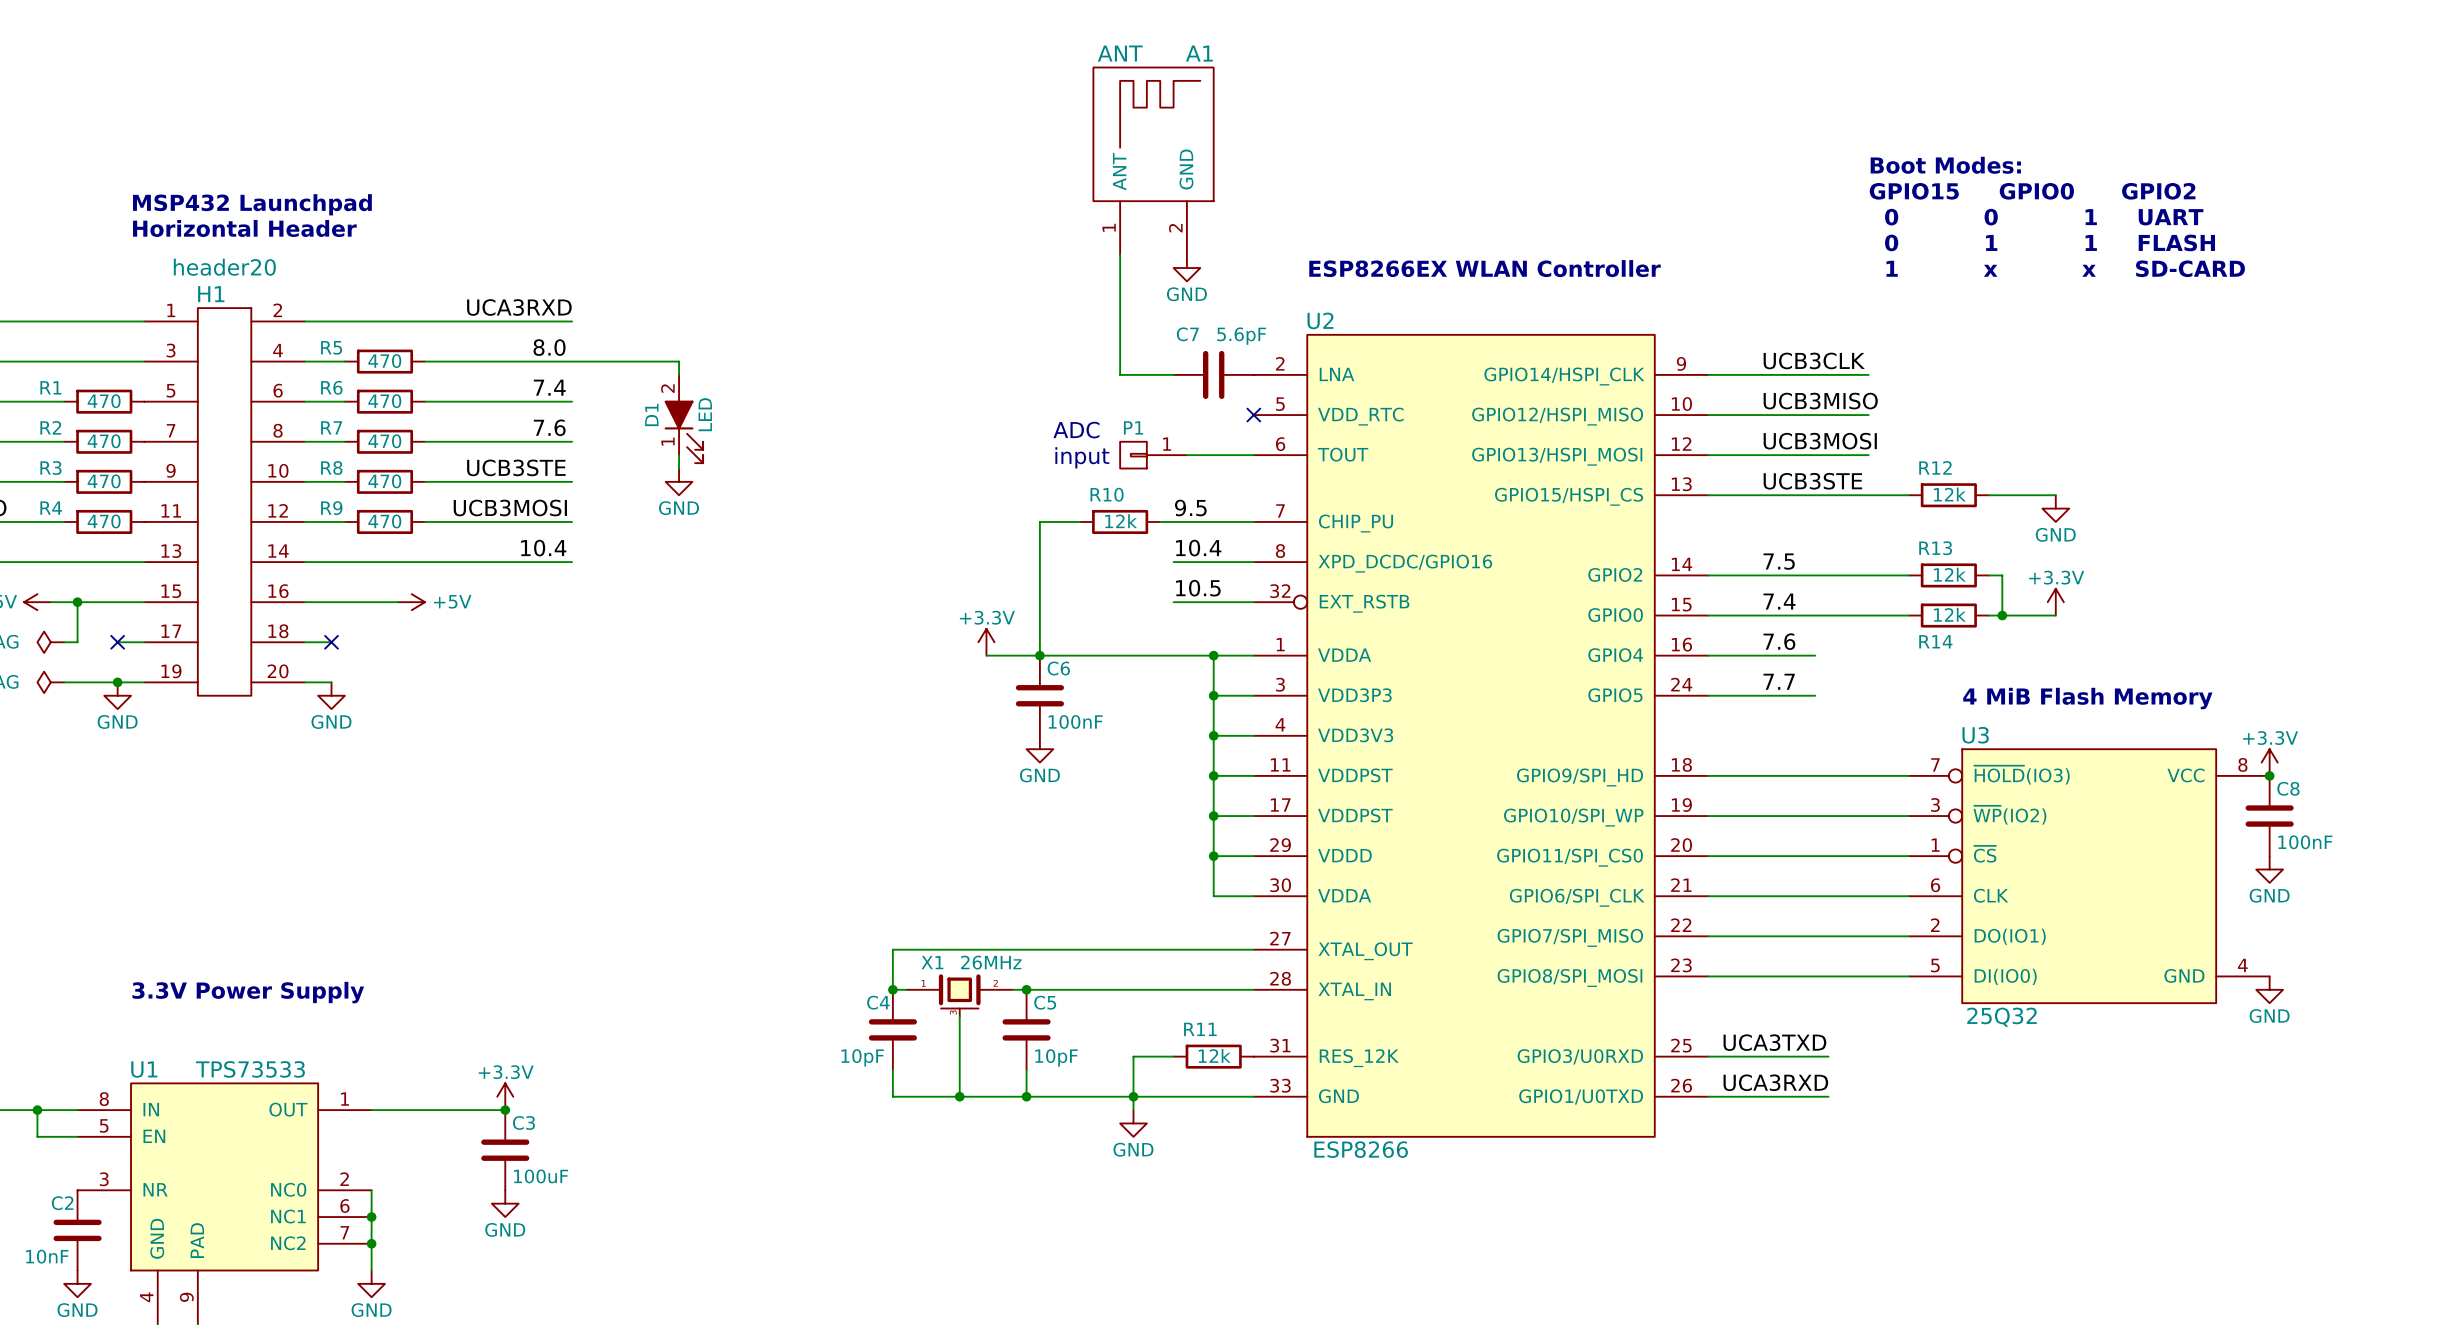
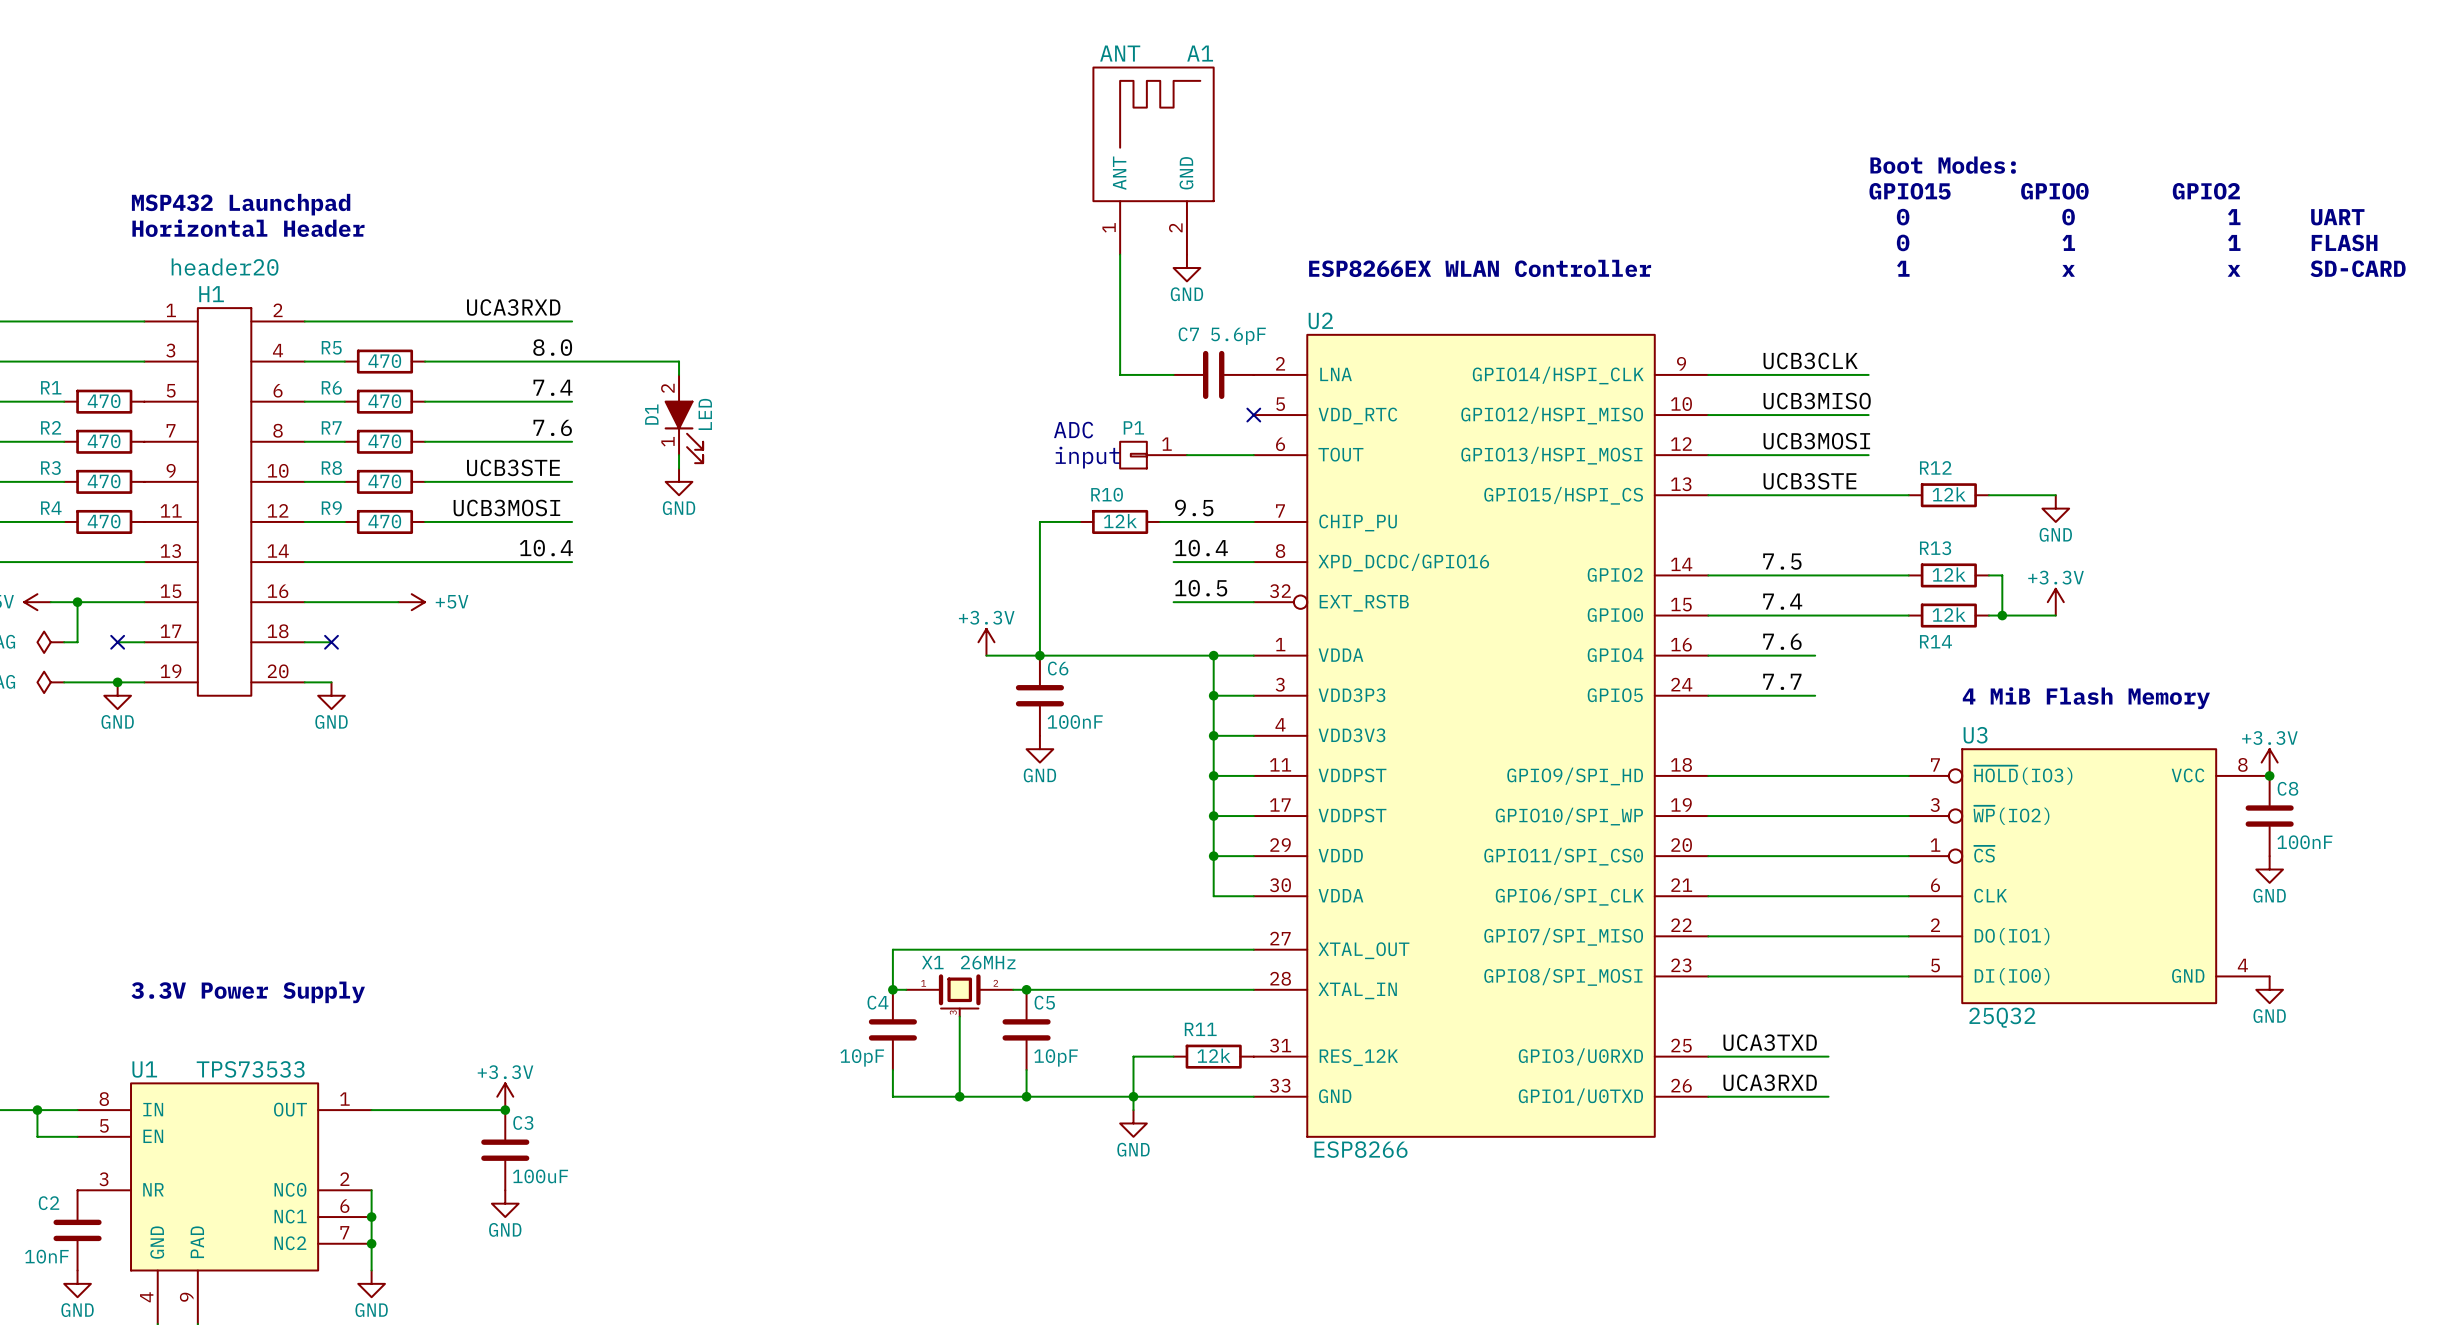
C2 name position: C2 (62, 1203) -> C2 (49, 1203)

